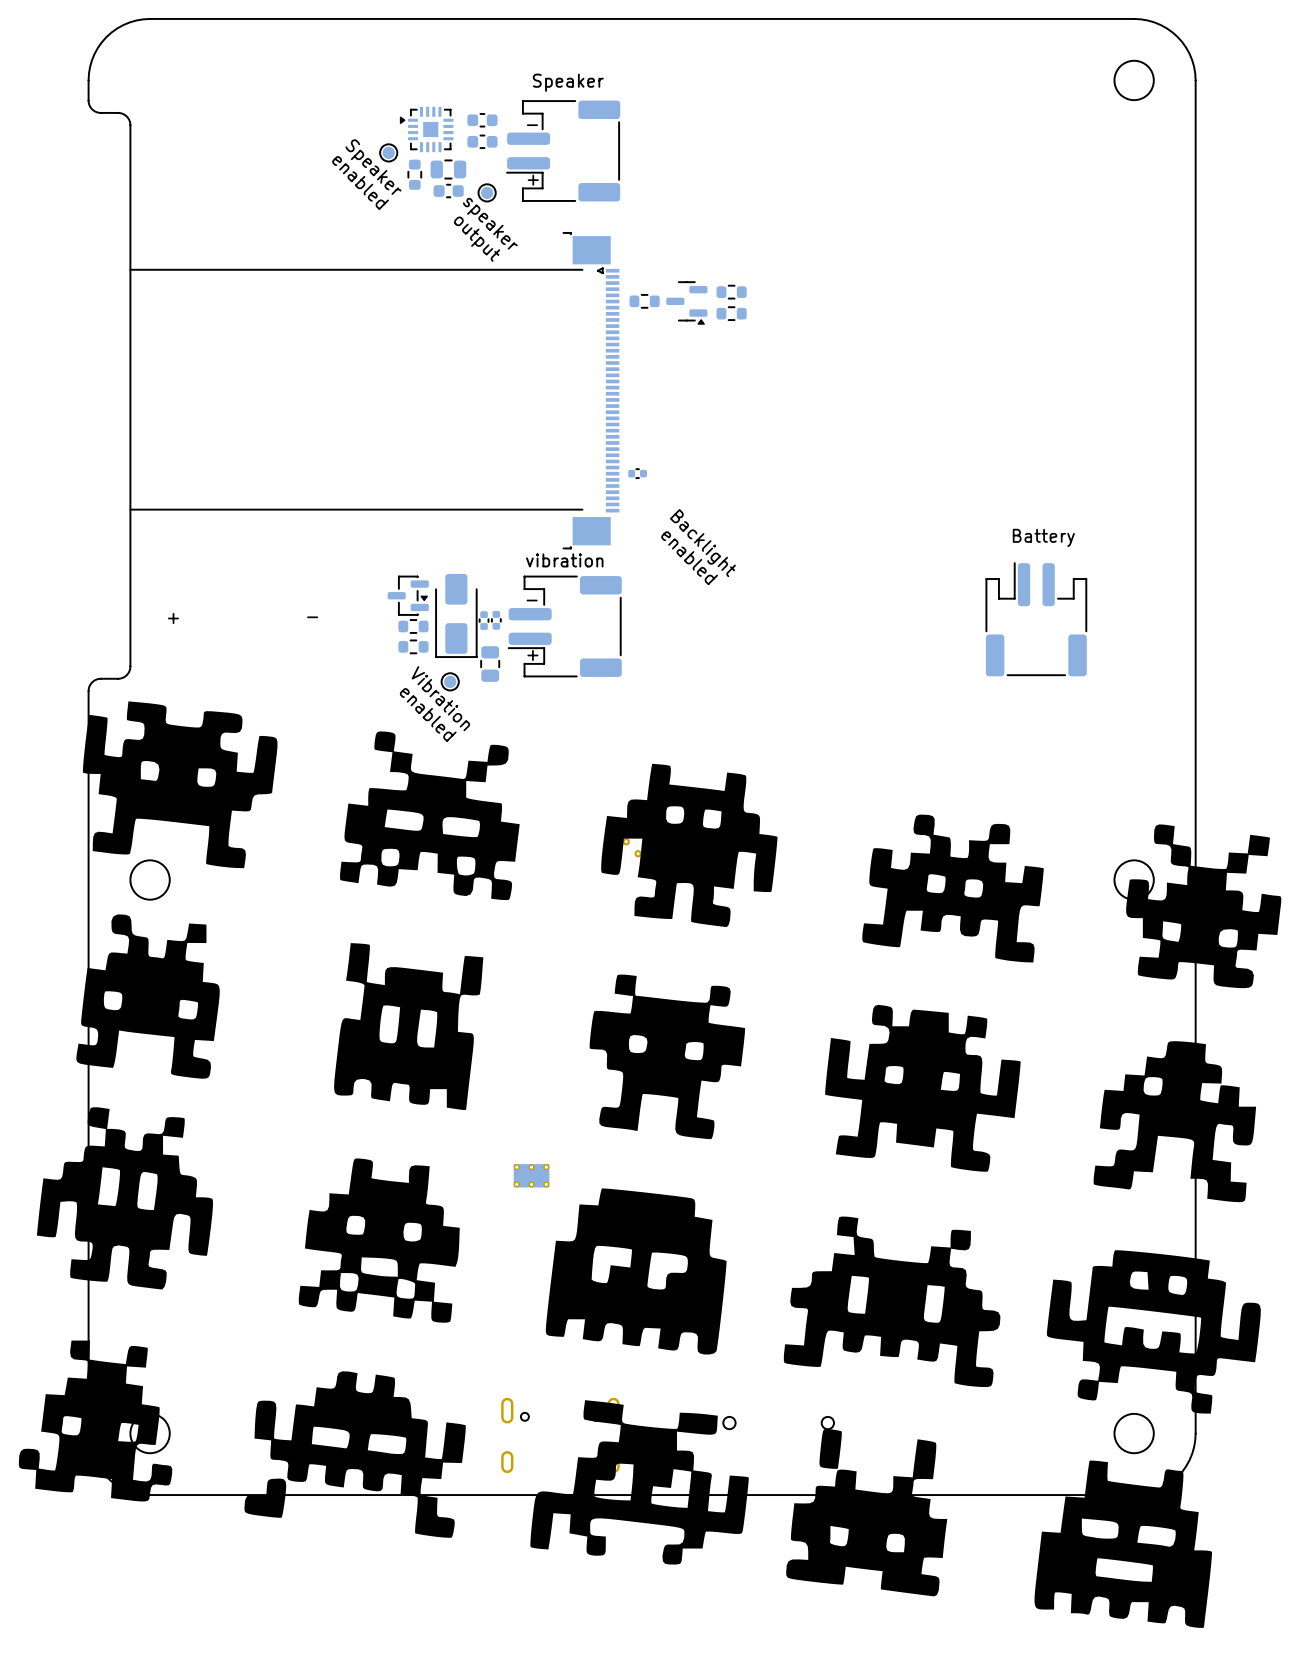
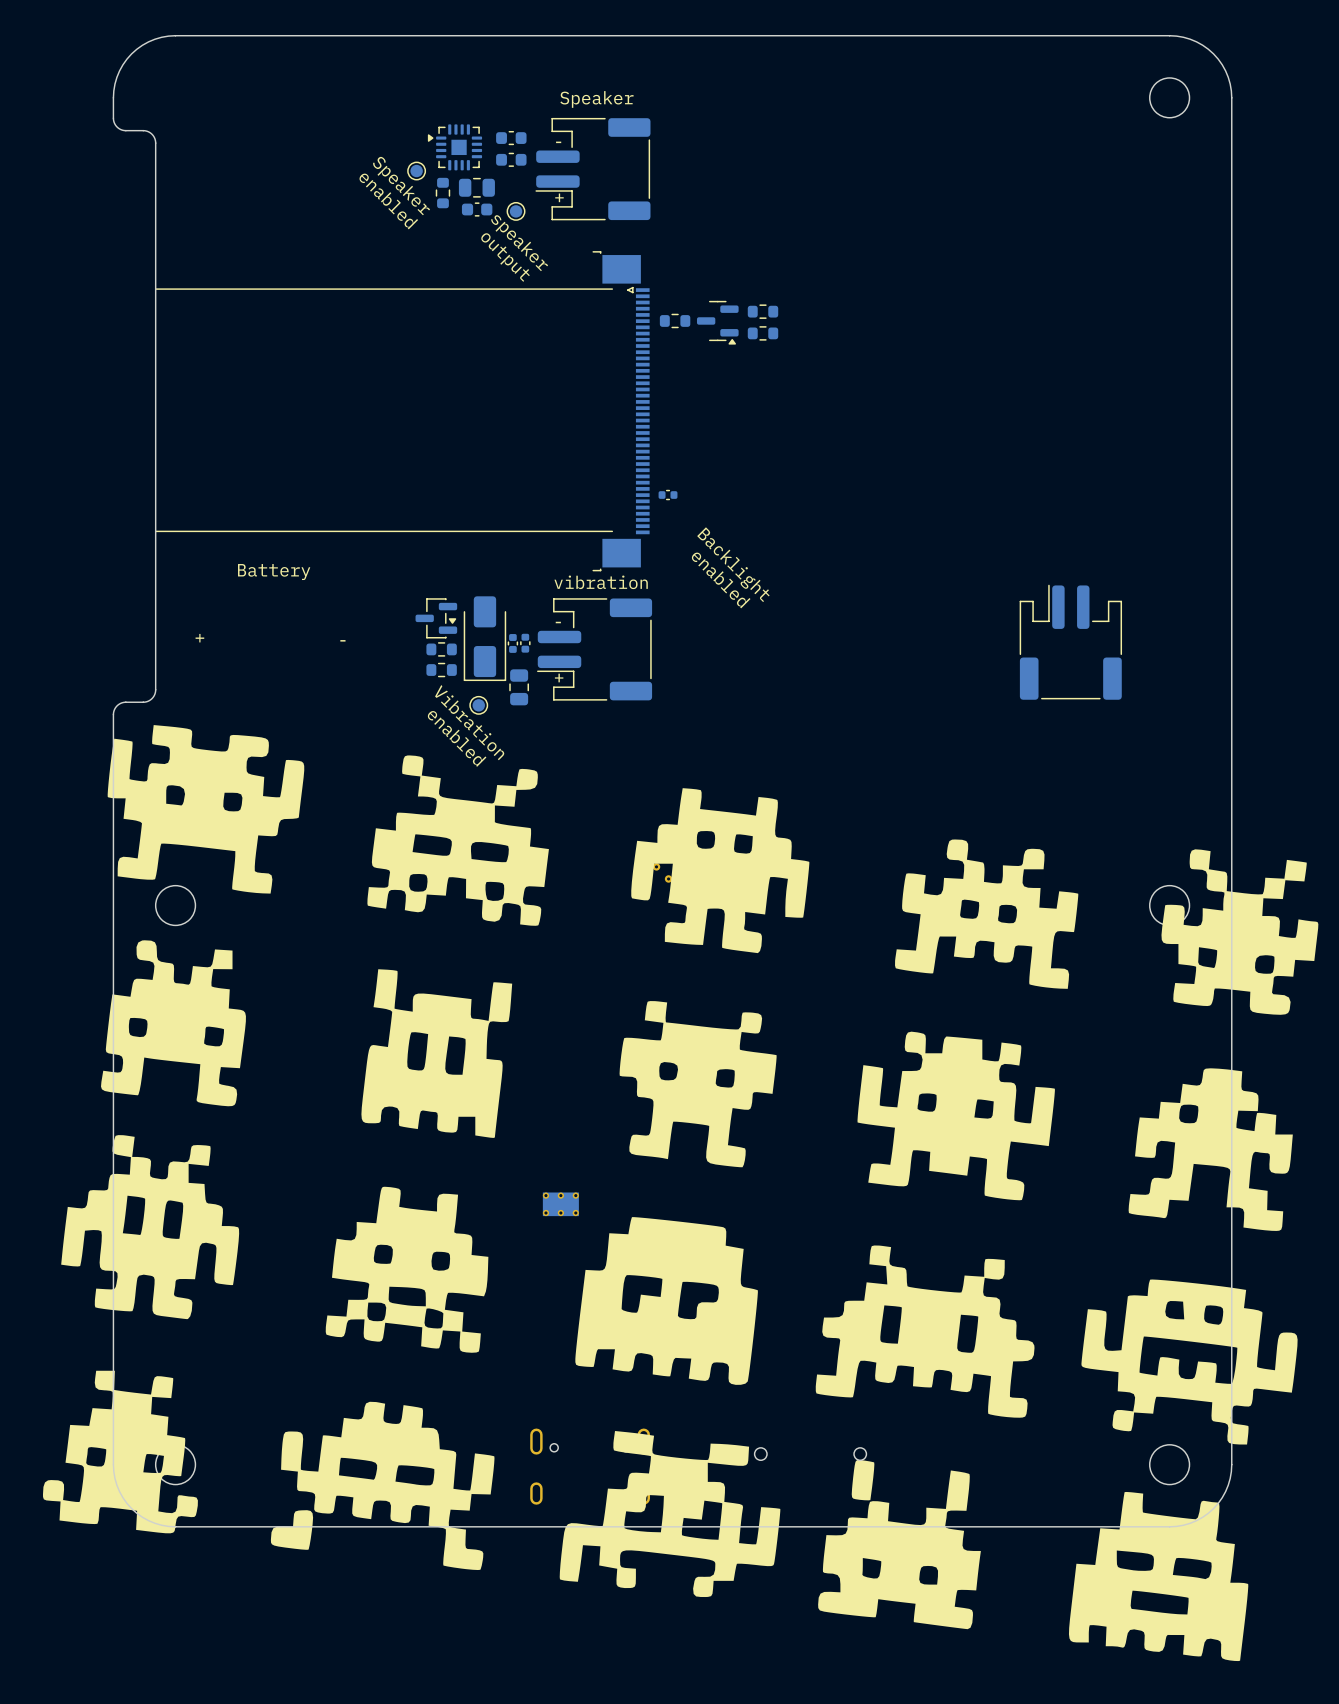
text: Battery (1043, 537) -> none
text: none -> Battery (274, 572)

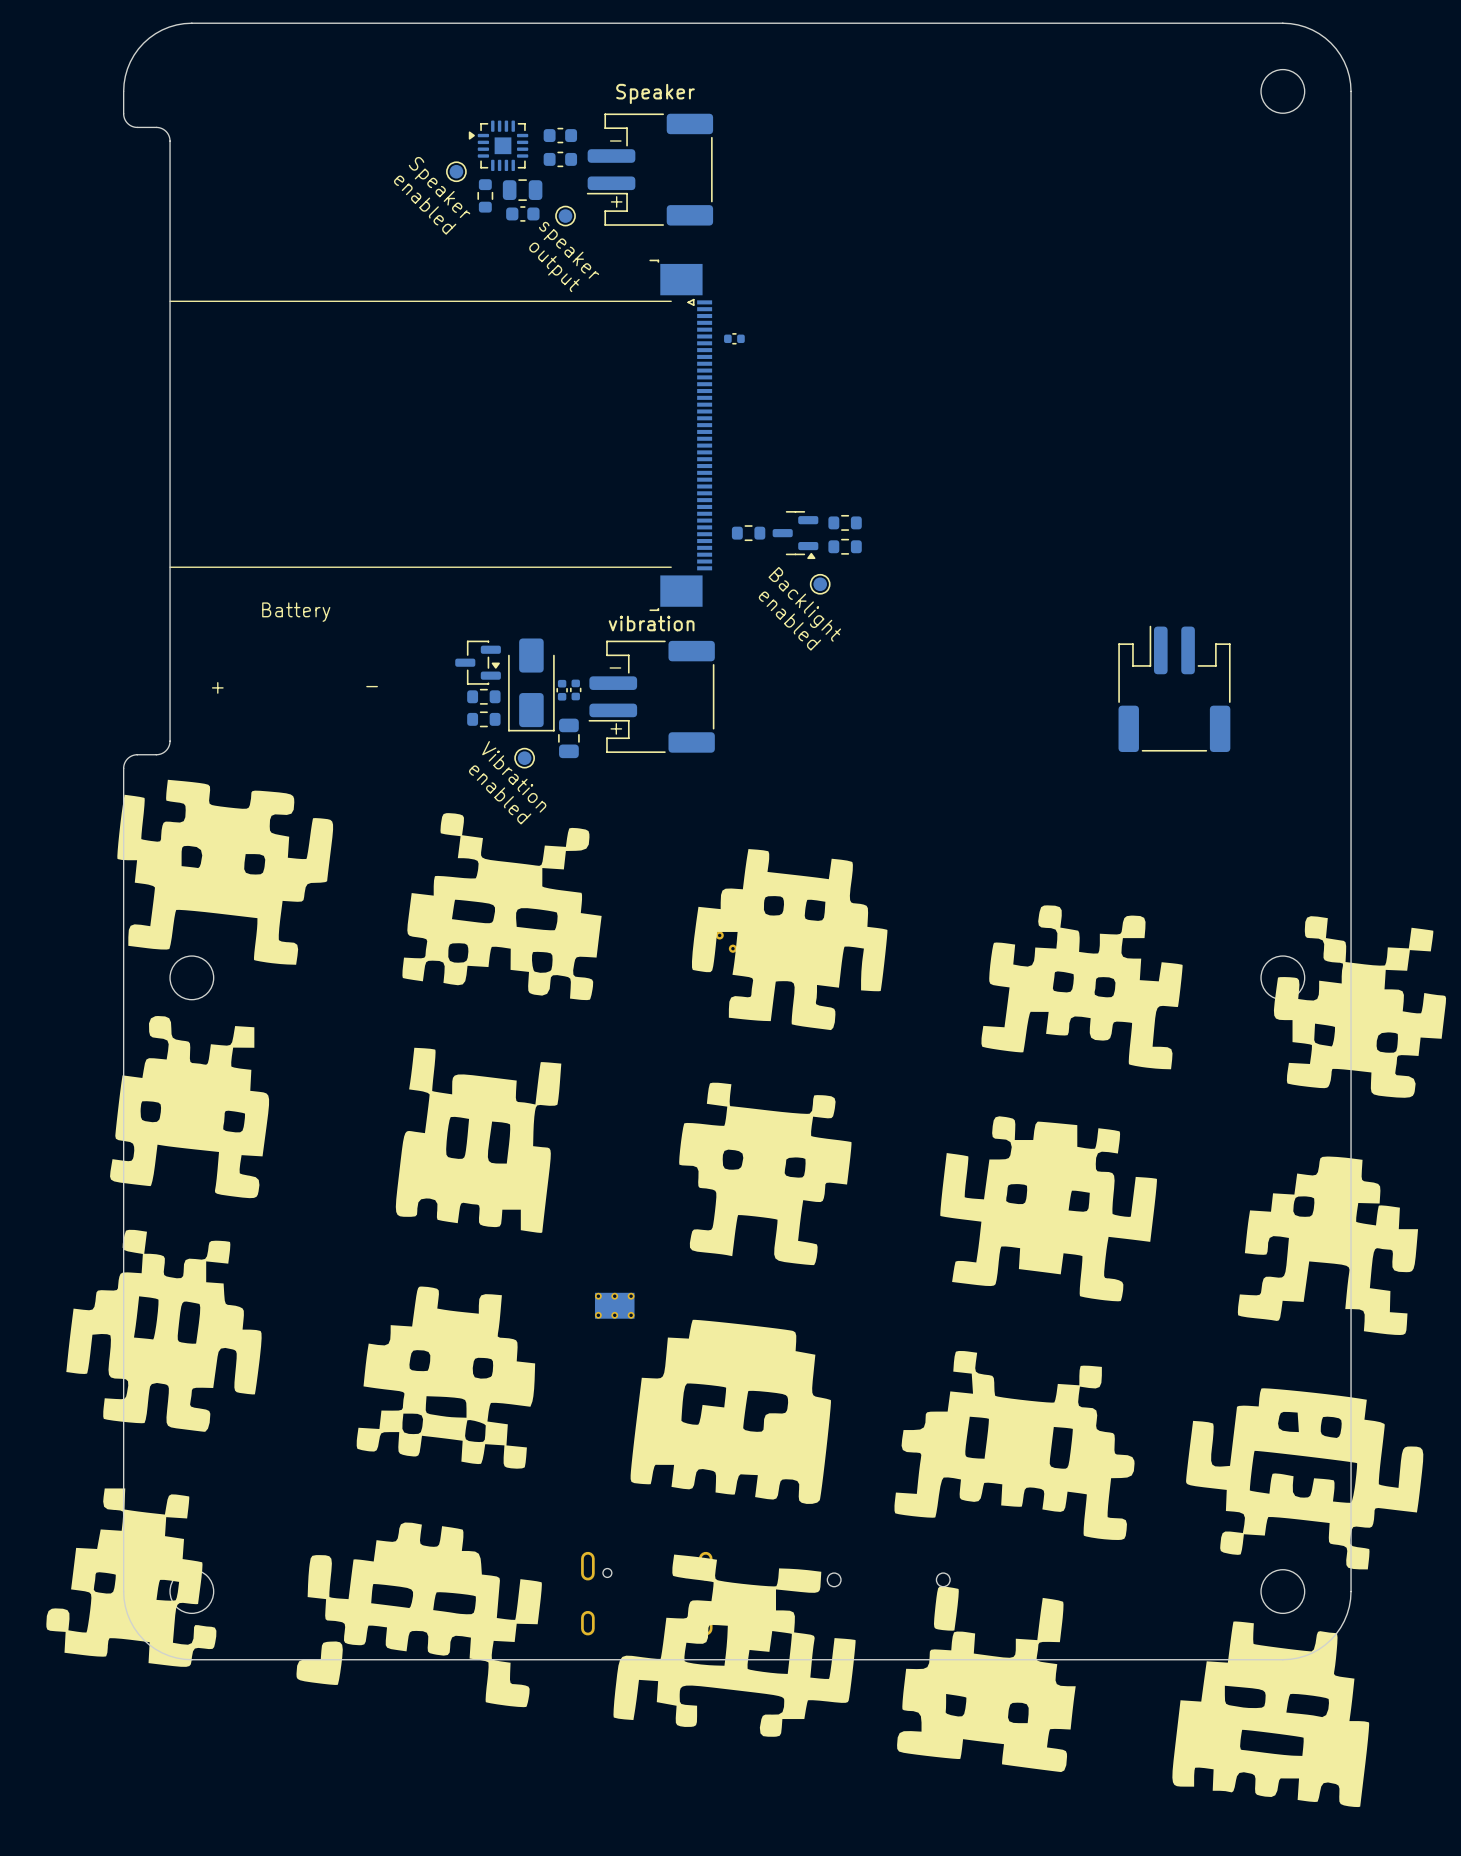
part: (762, 311) -> none
part footprint: [659, 313, 691, 329] -> [724, 333, 745, 345]
part position: (717, 322) -> (795, 535)
part: (762, 333) -> none
part: none -> (845, 522)
part: (668, 495) -> none
part: none -> (748, 533)
part: none -> (845, 546)
part: none -> (820, 584)

